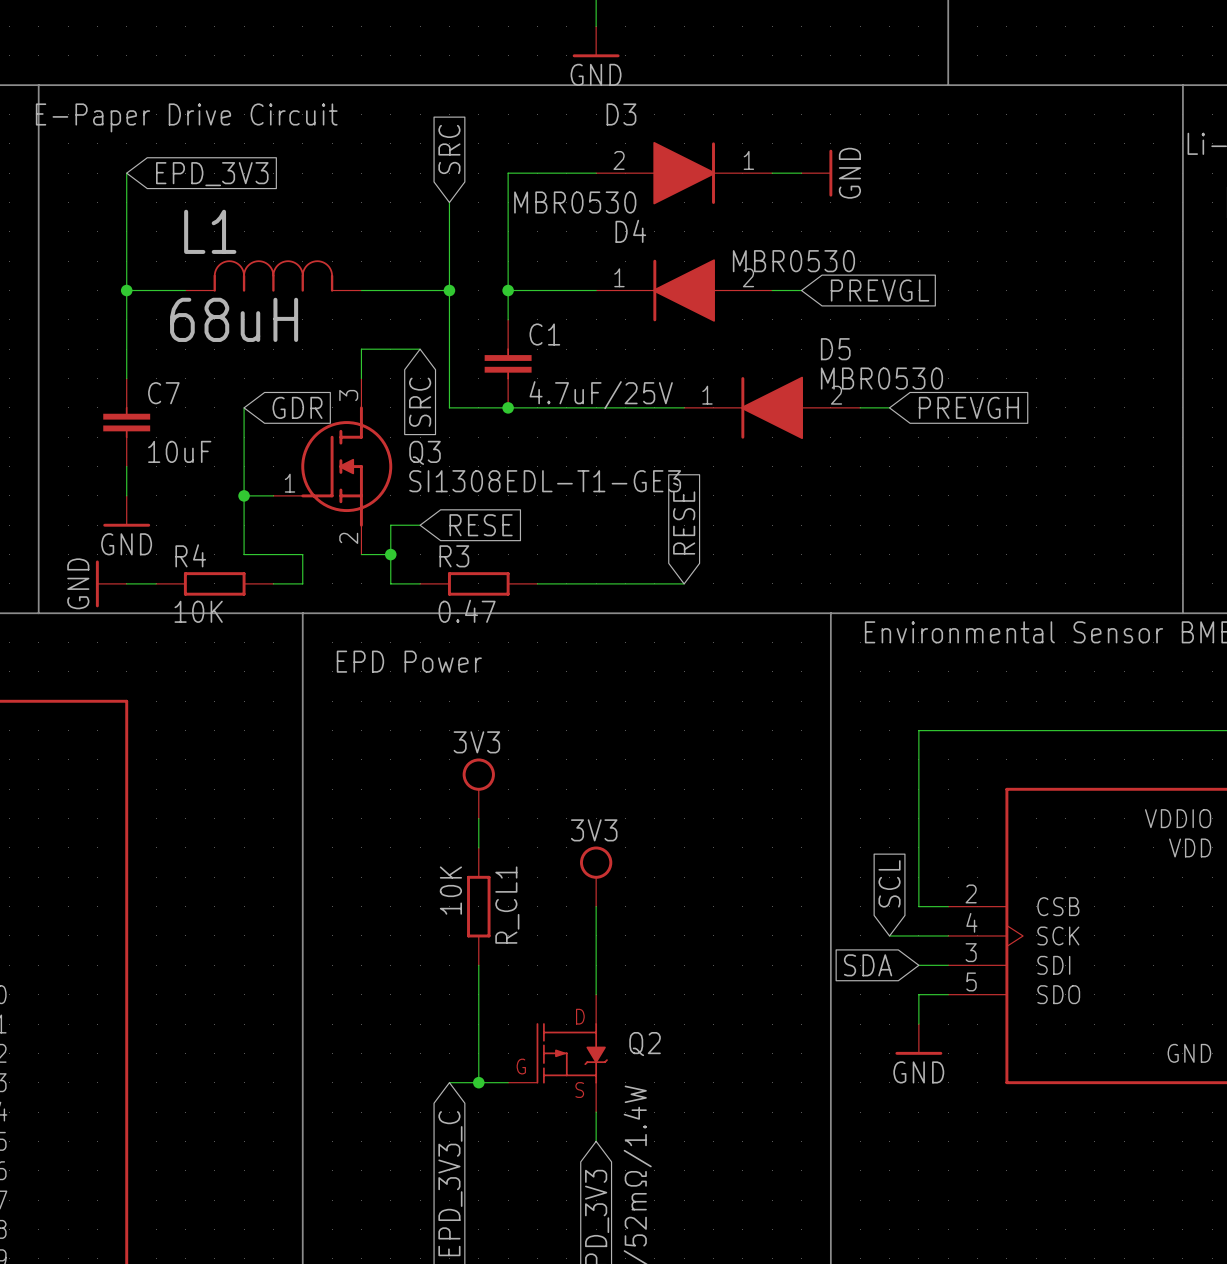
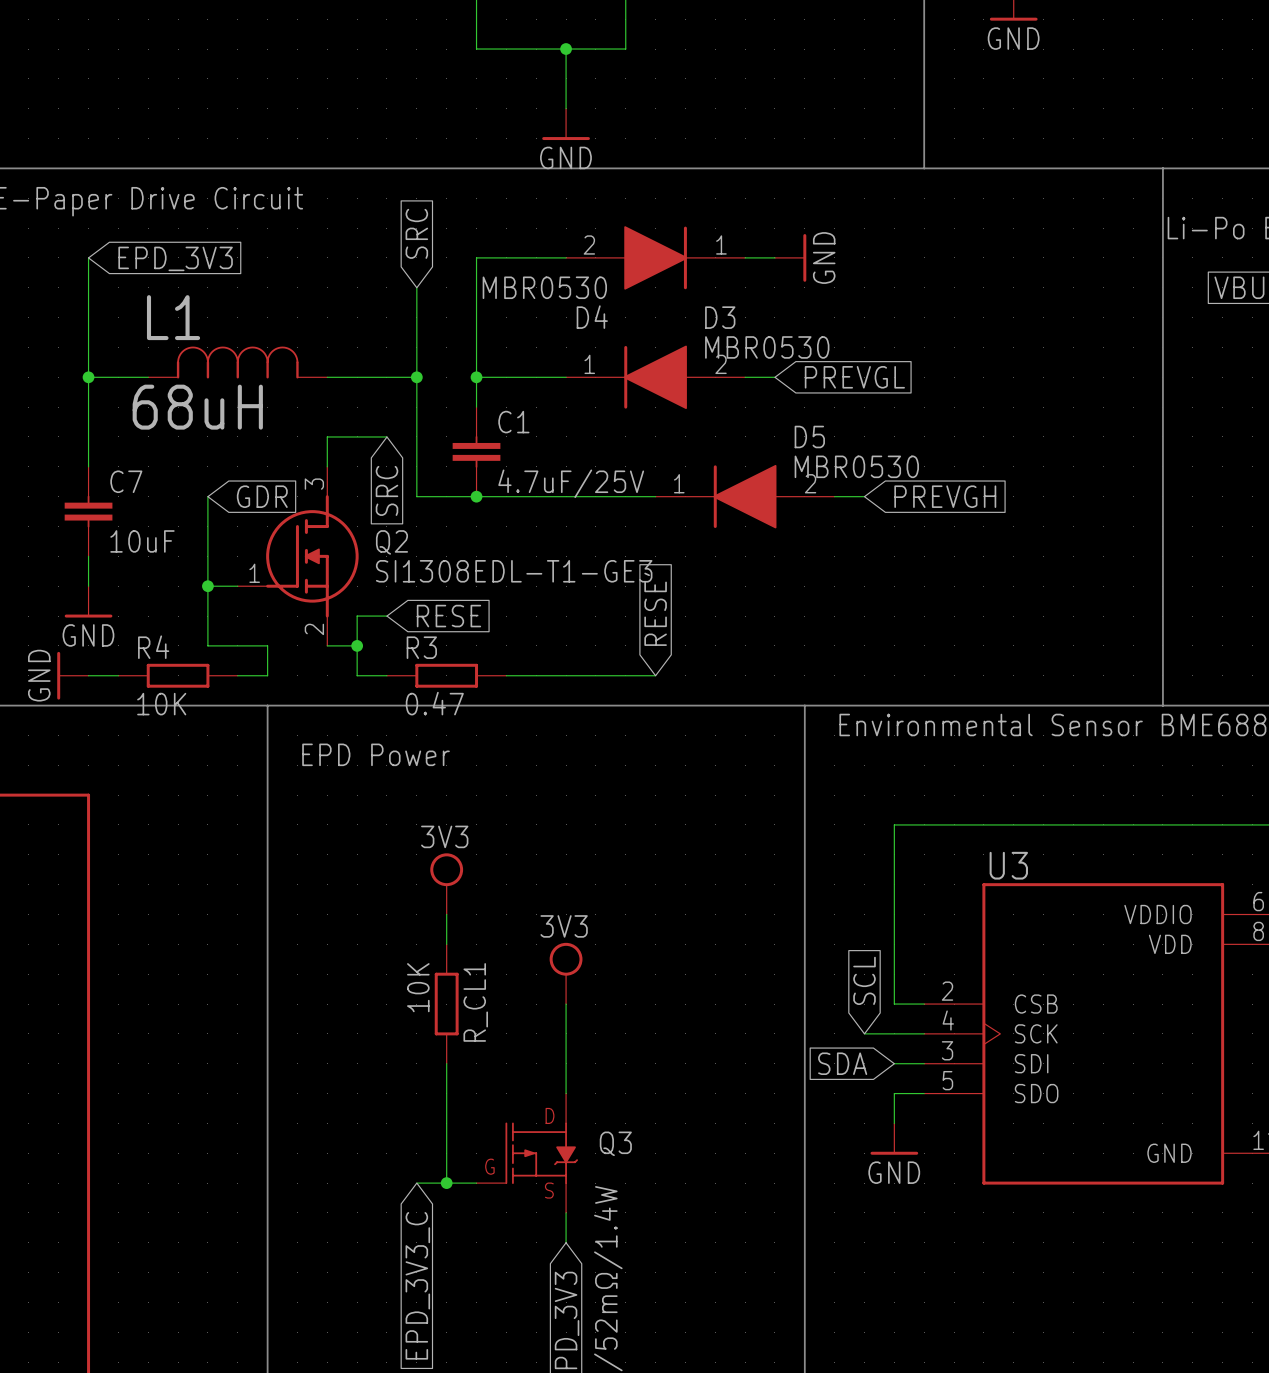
D3 name: D3 (621, 114) -> D4 (592, 317)
D4 name: D4 (630, 231) -> D3 (720, 317)
Q3 name: Q3 (425, 452) -> Q2 (391, 542)
U3 name: none -> U3 (1008, 865)
Q2 name: Q2 (645, 1044) -> Q3 (615, 1143)

